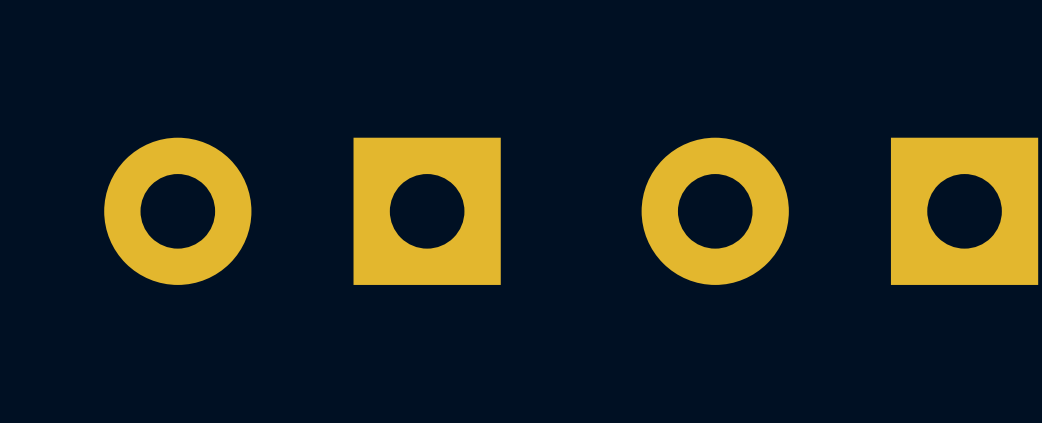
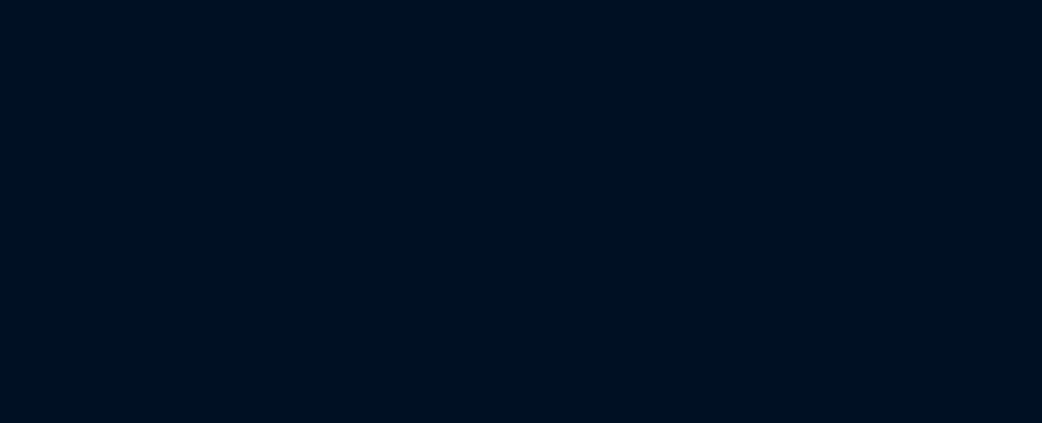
part: (302, 211) -> none
part: (839, 211) -> none

